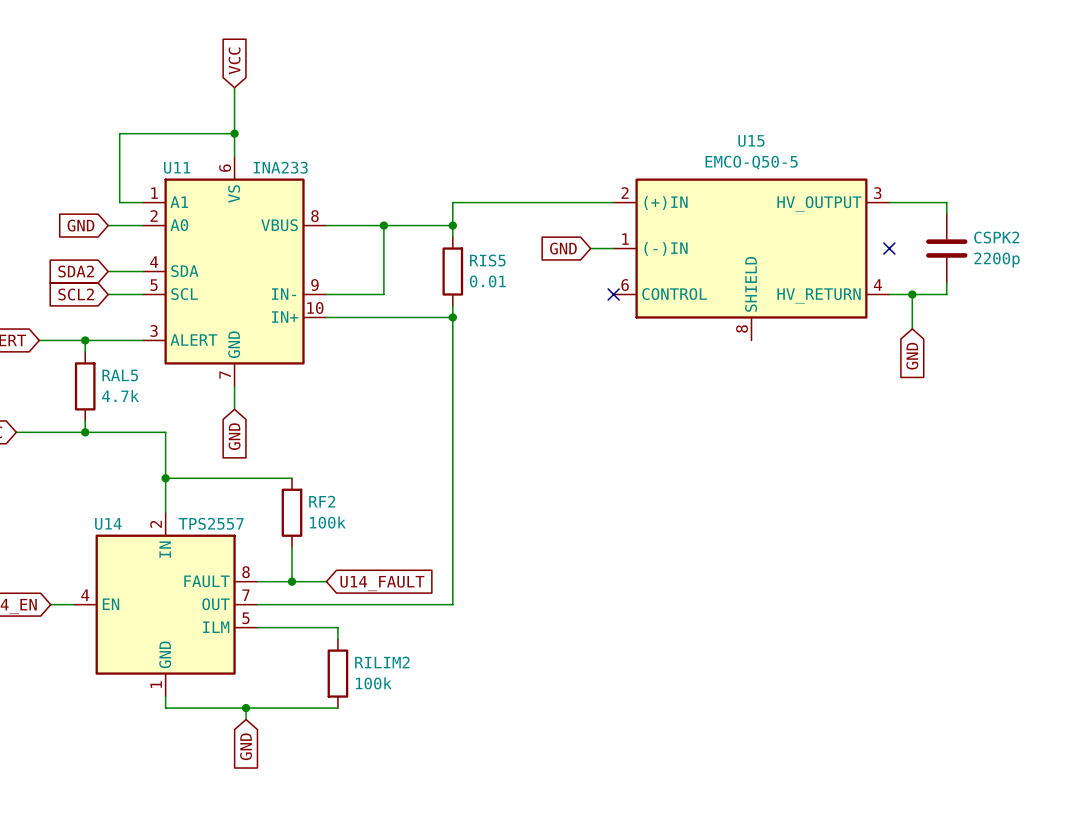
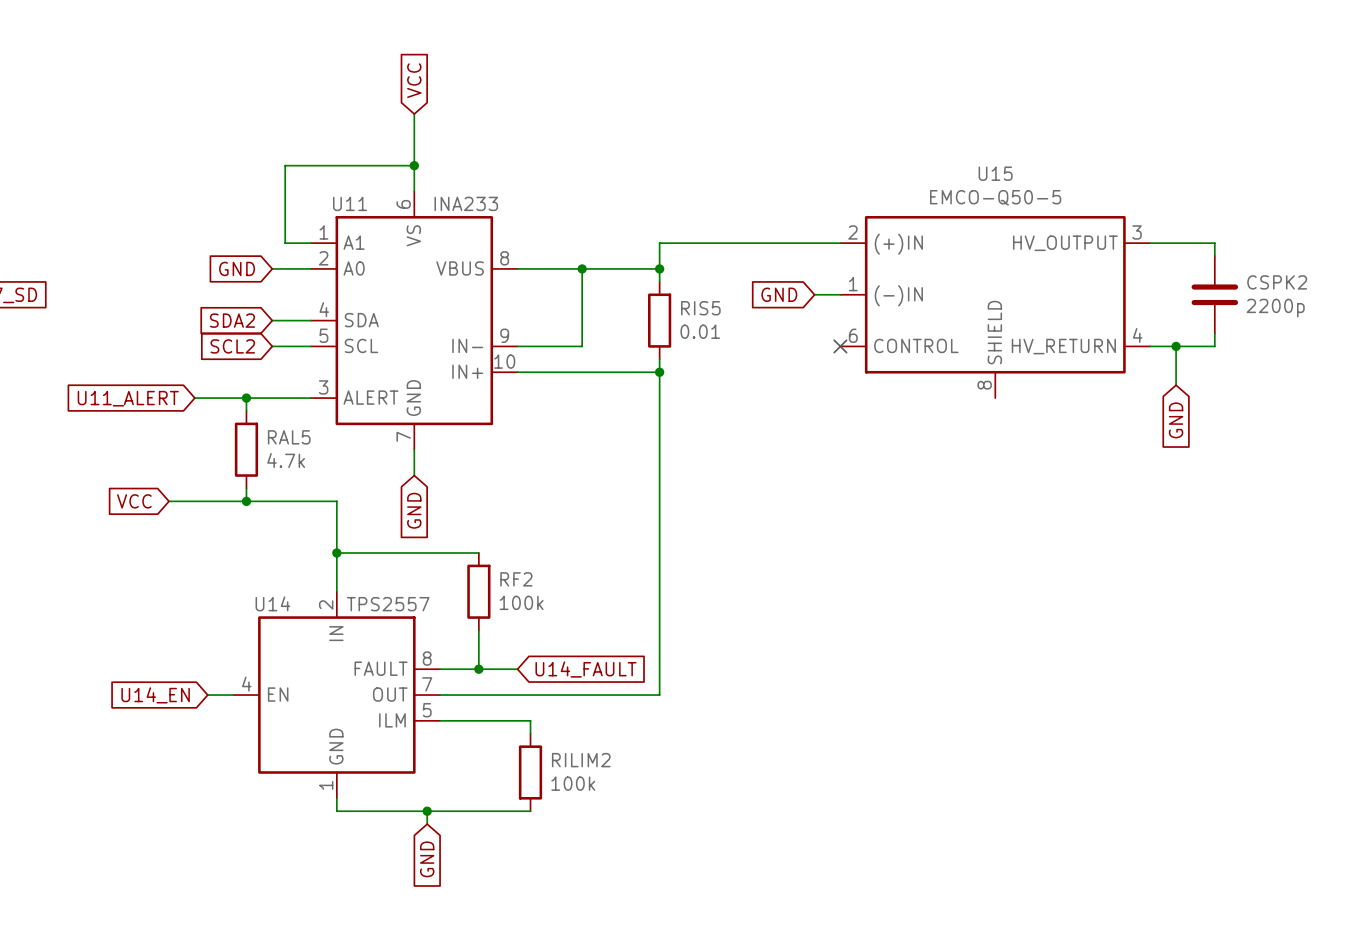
no-connect mark: (889, 248) -> none

